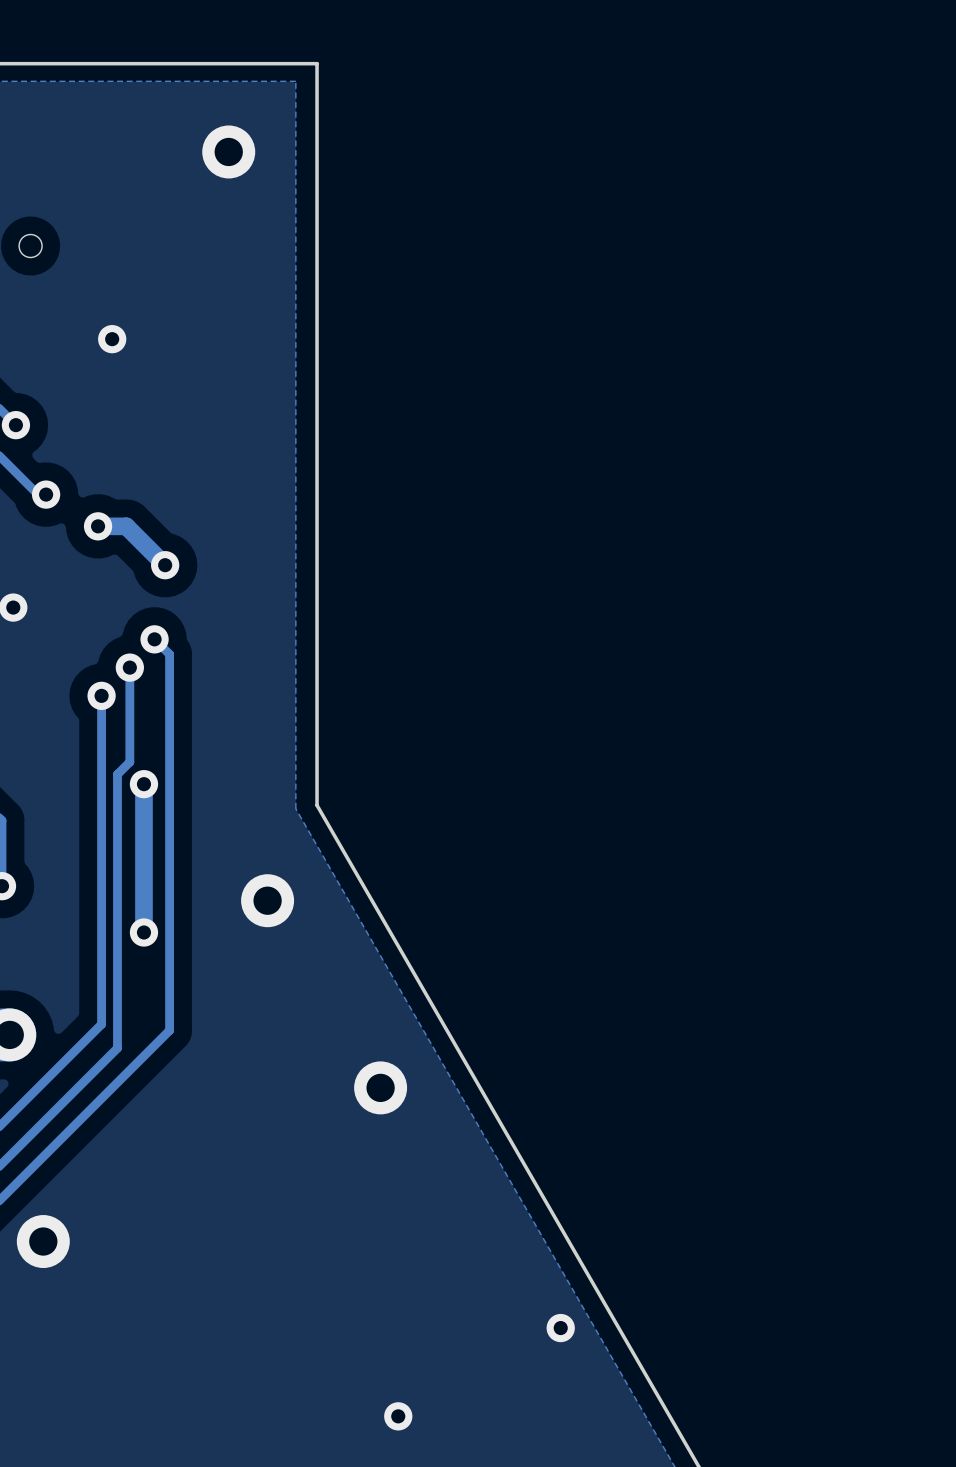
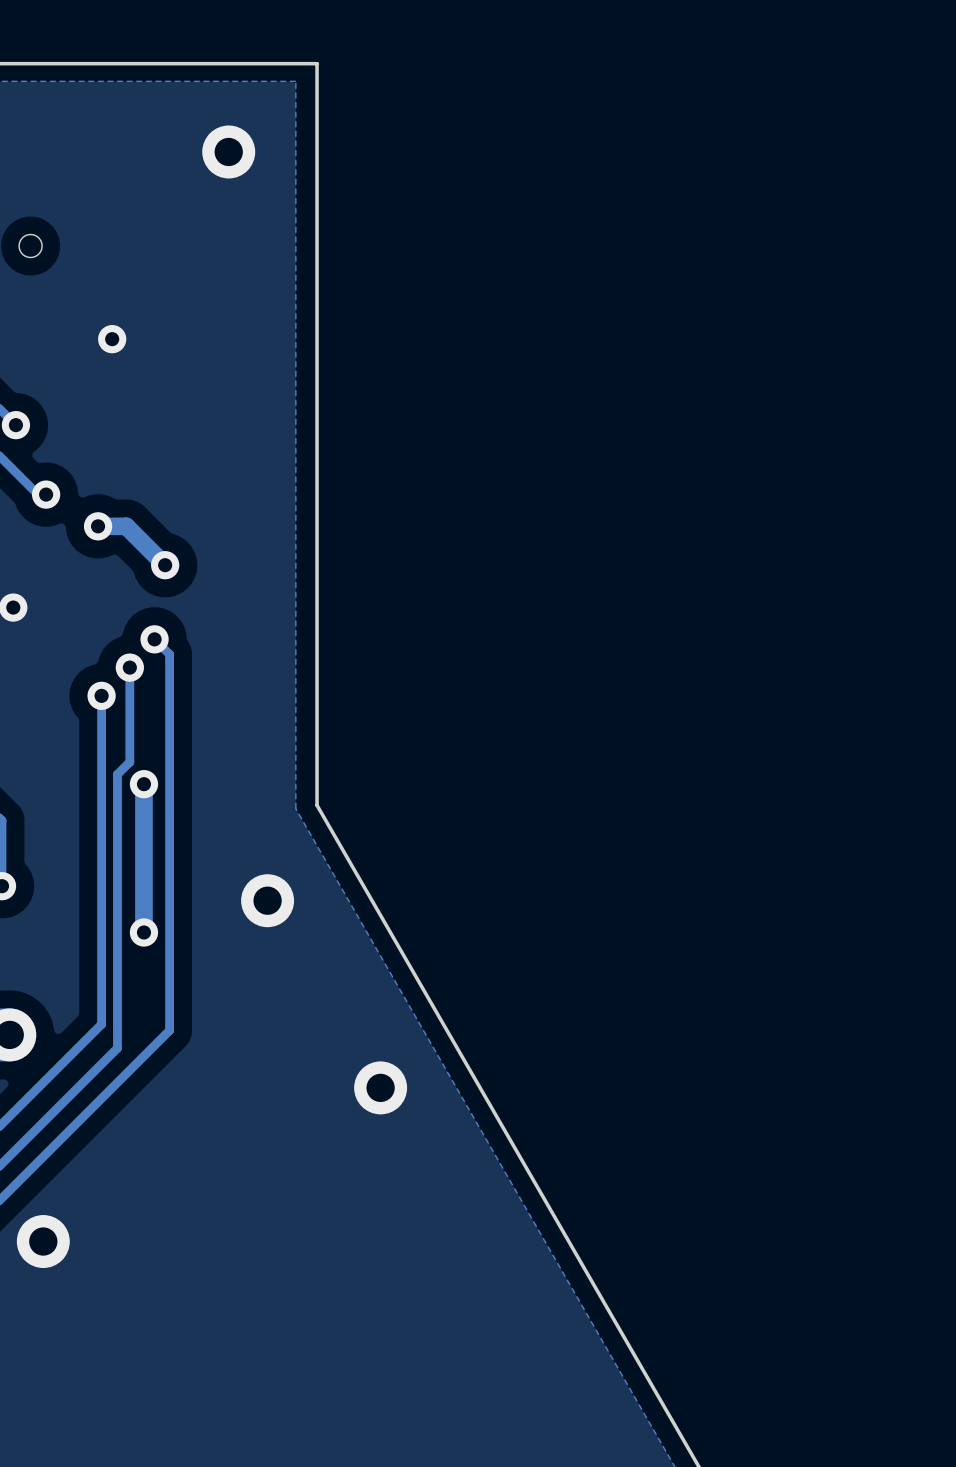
via: (560, 1328) -> none
via: (398, 1416) -> none

